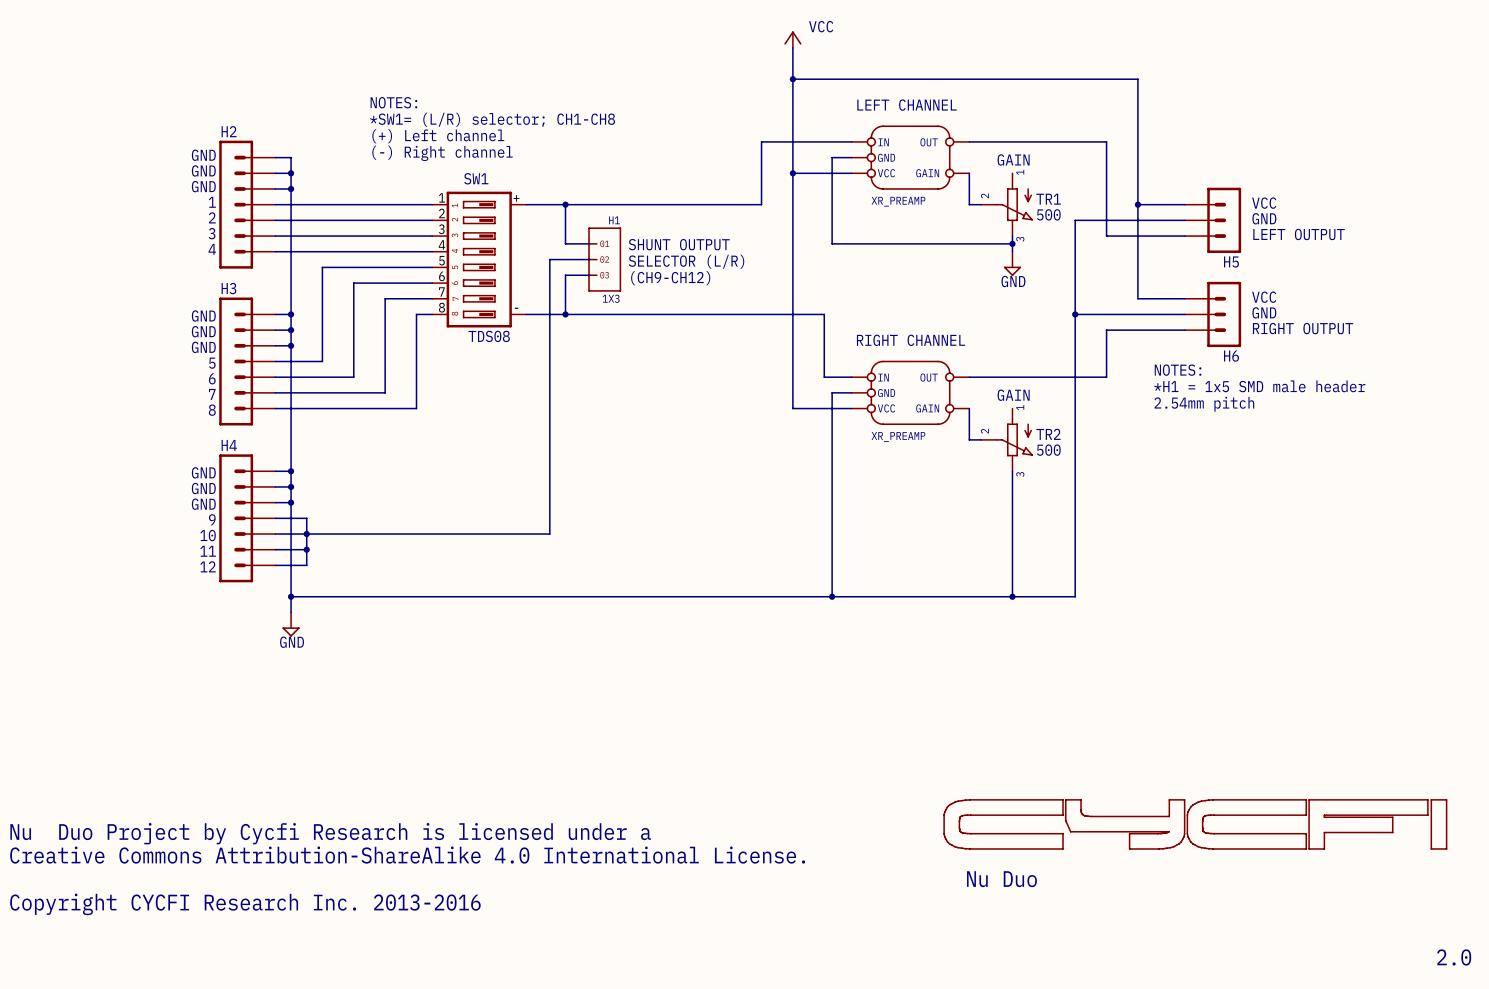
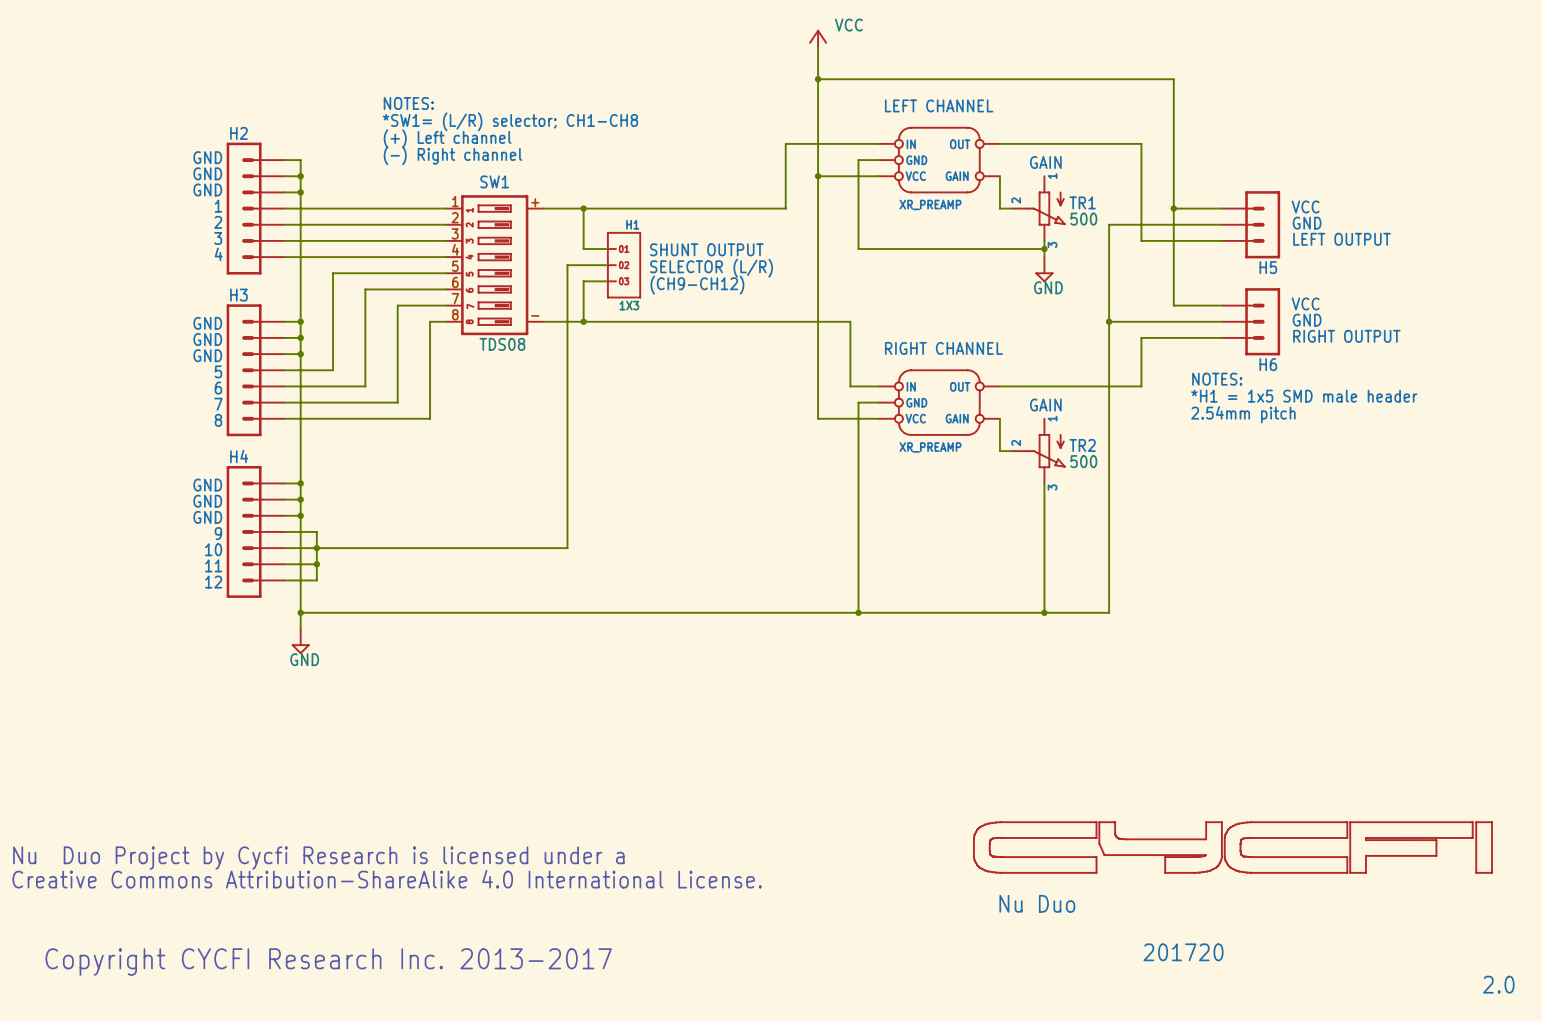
text: Copyright CYCFI Research Inc. 2013-2016 (245, 904) -> Copyright CYCFI Research Inc. 2013-2017 (328, 962)
text: none -> 201720 (1183, 952)

